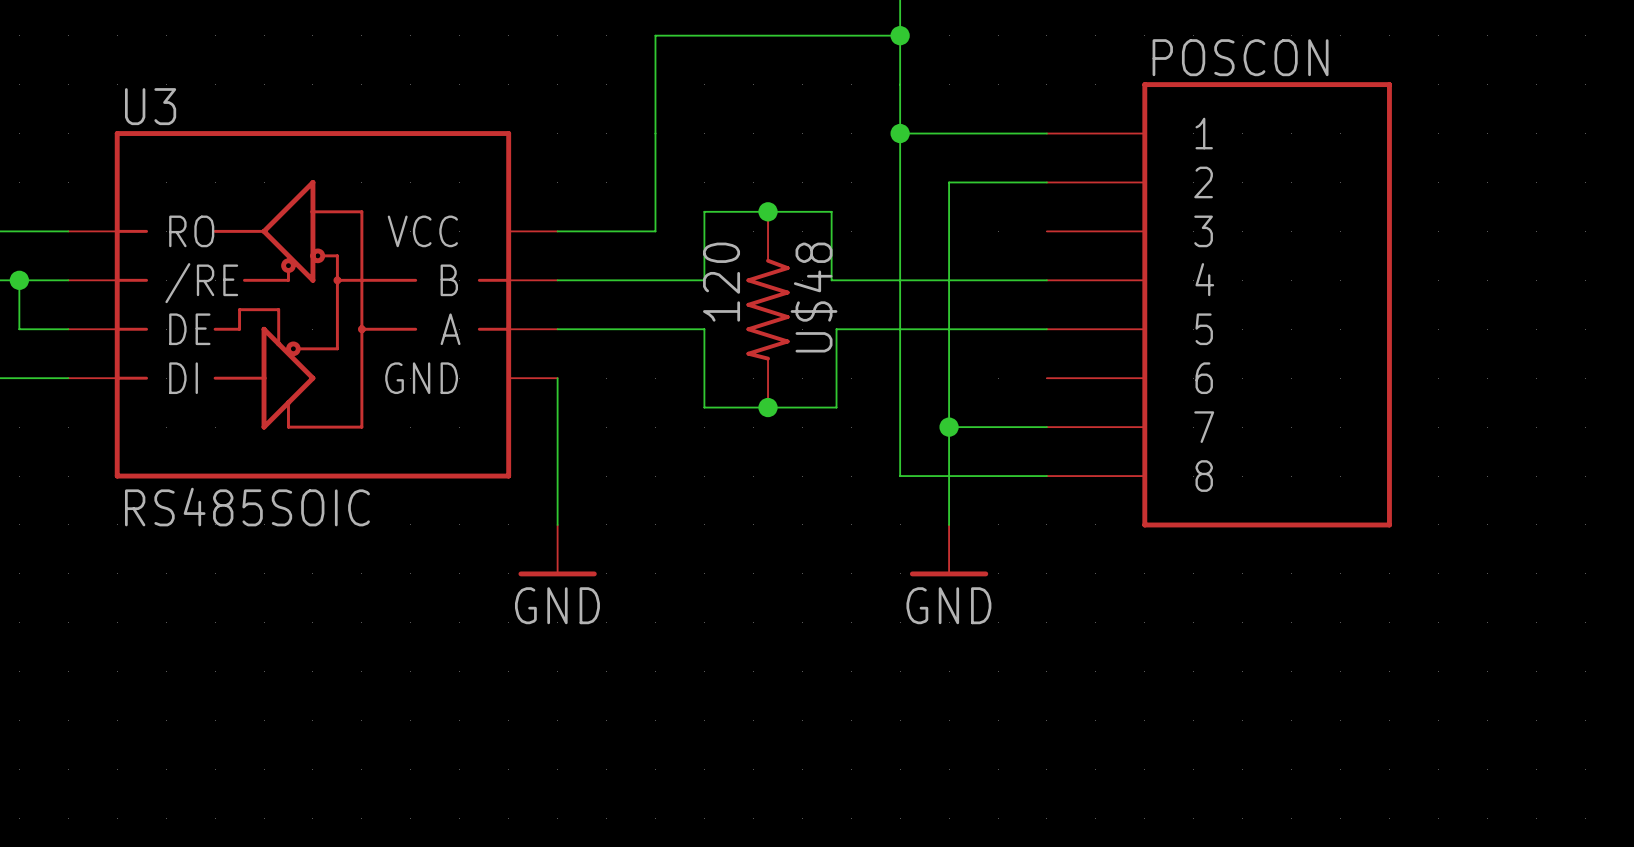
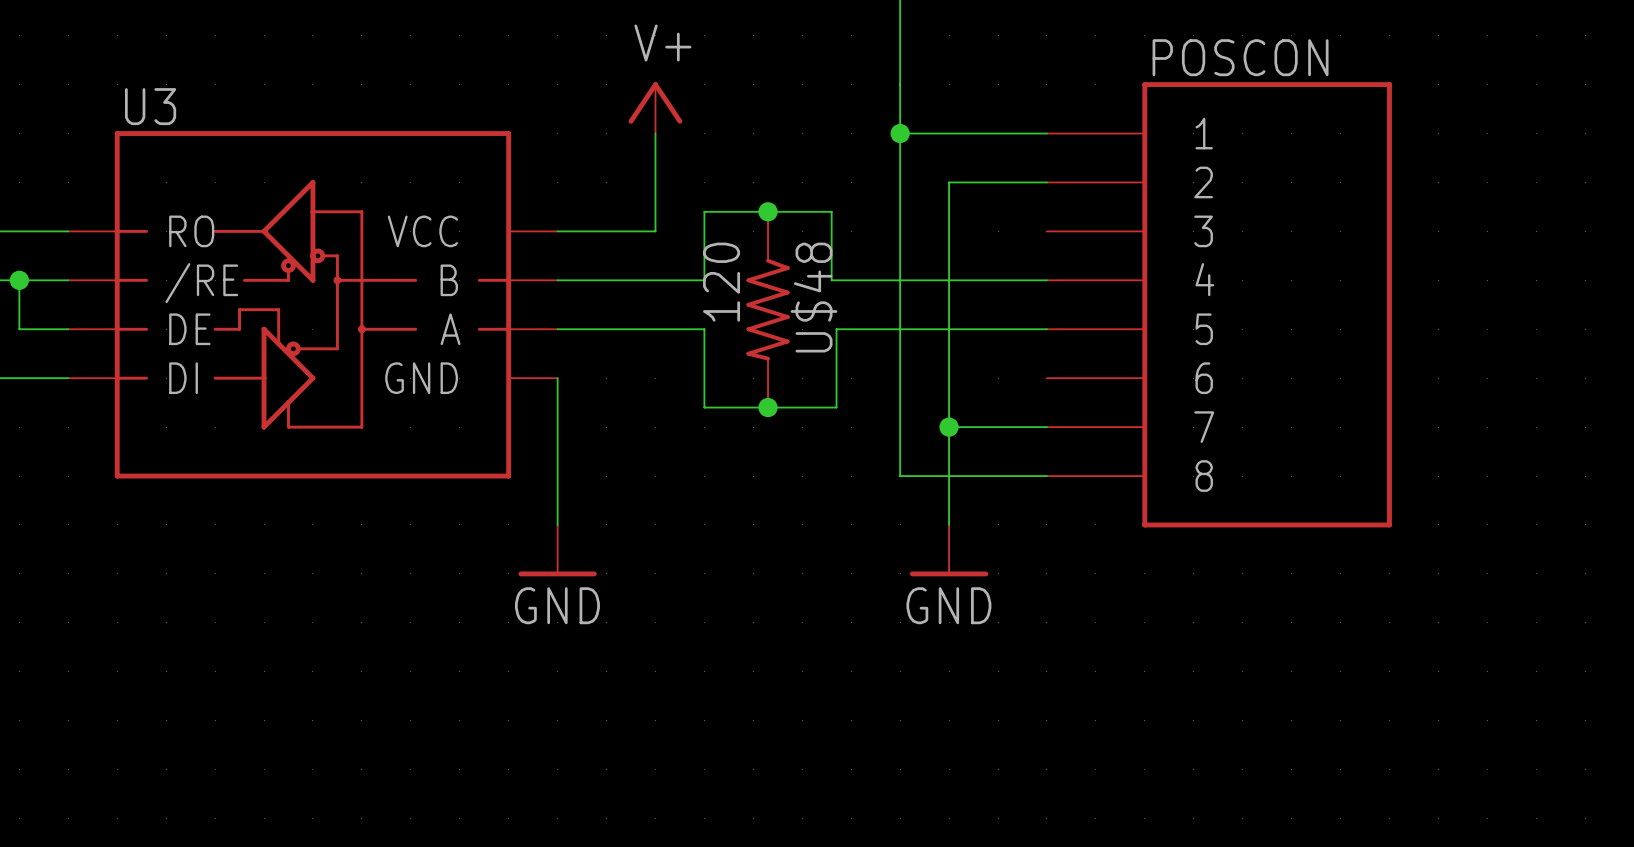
wire: (900, 35) (655, 35) (655, 133) -> none
junction: (900, 35) -> none
power symbol: none -> V+ (655, 107)
U3 value: RS485SOIC (247, 507) -> none

